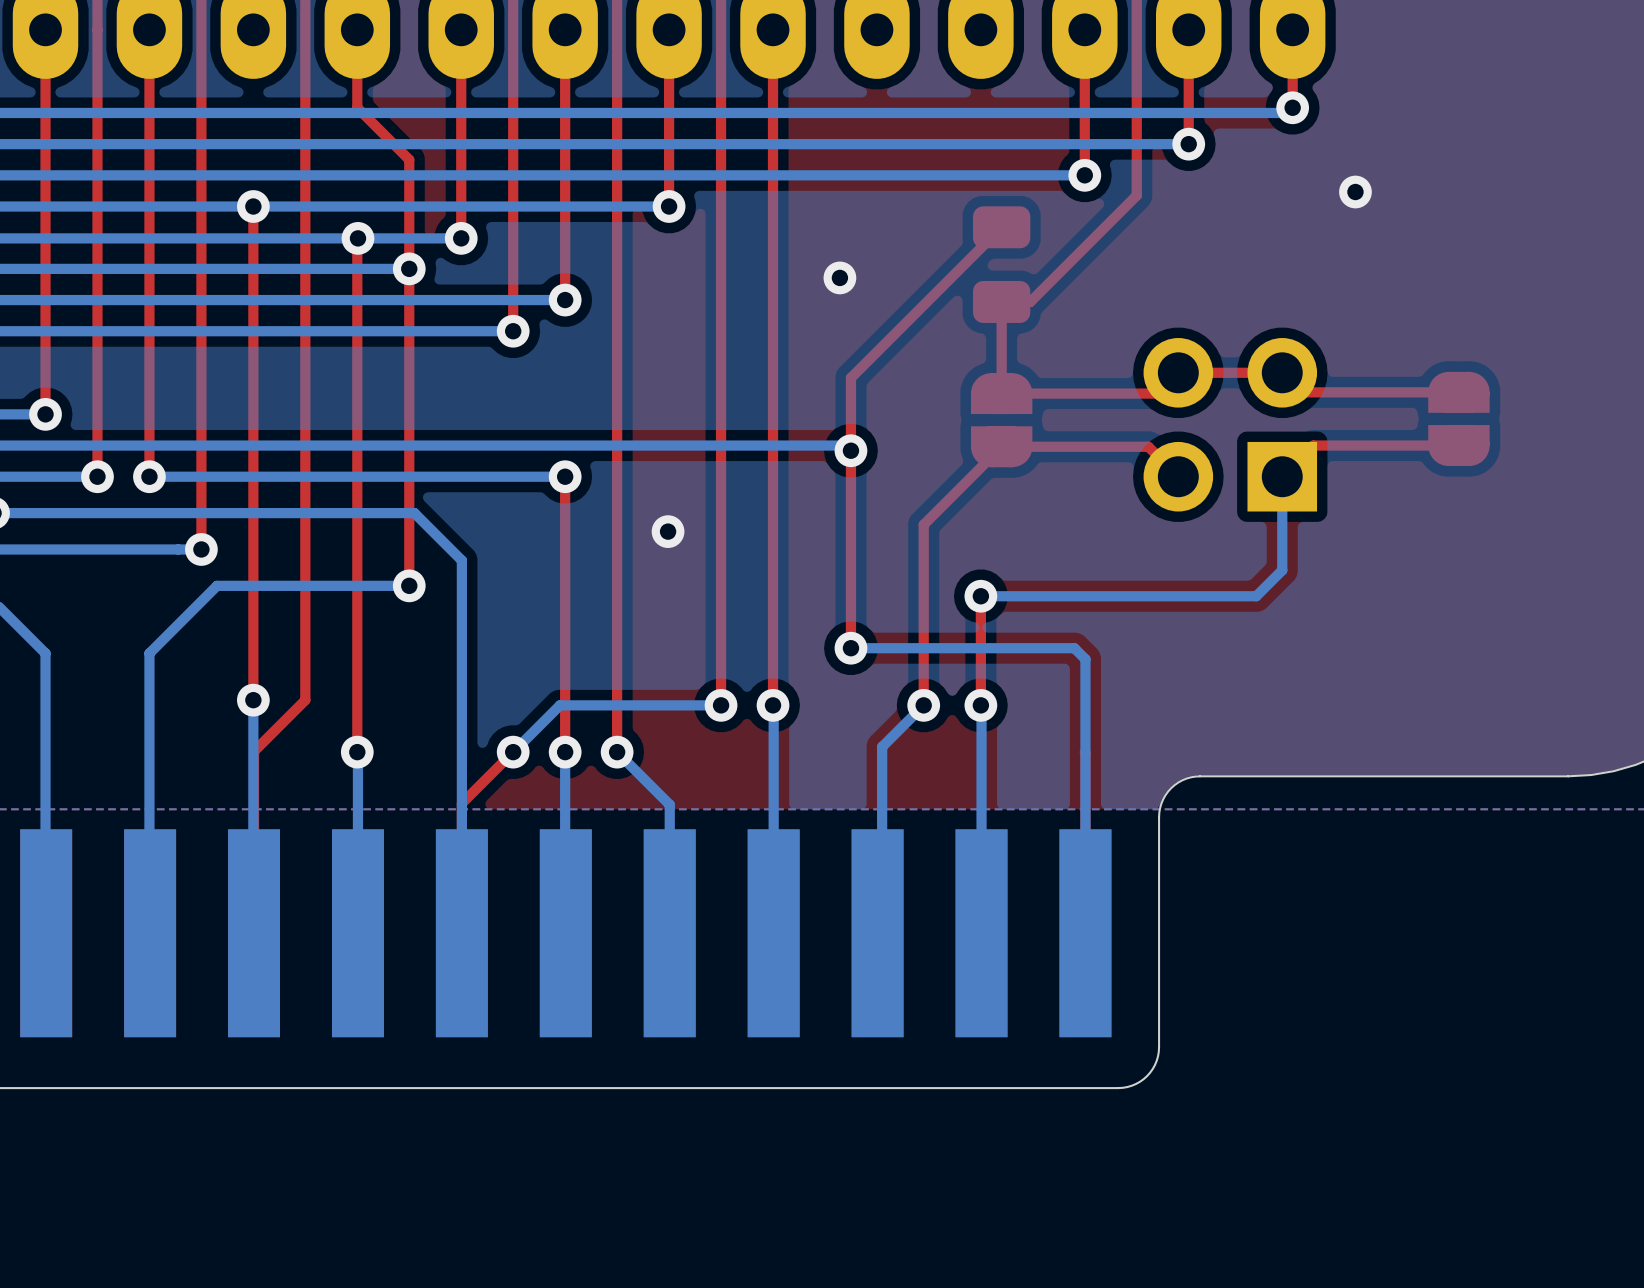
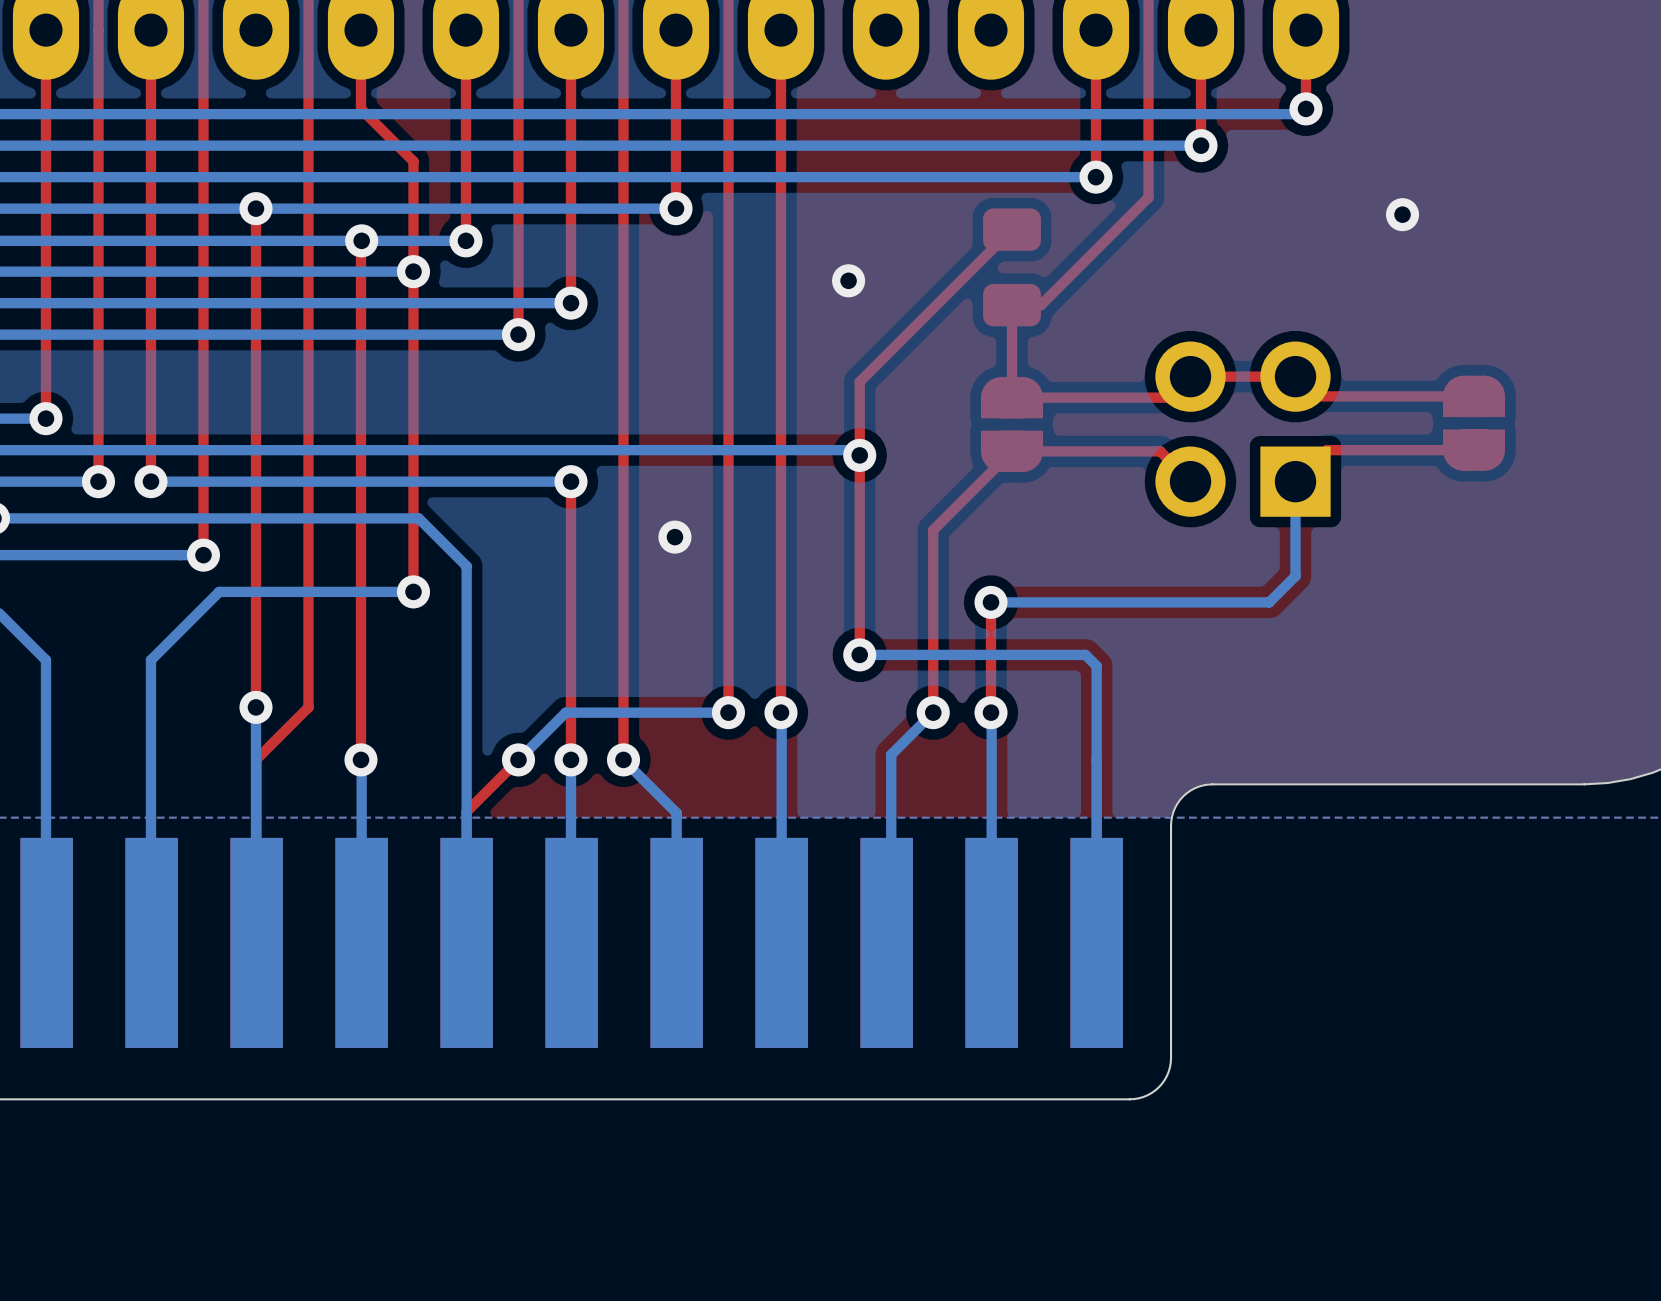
via position: (1355, 192) -> (1402, 214)

